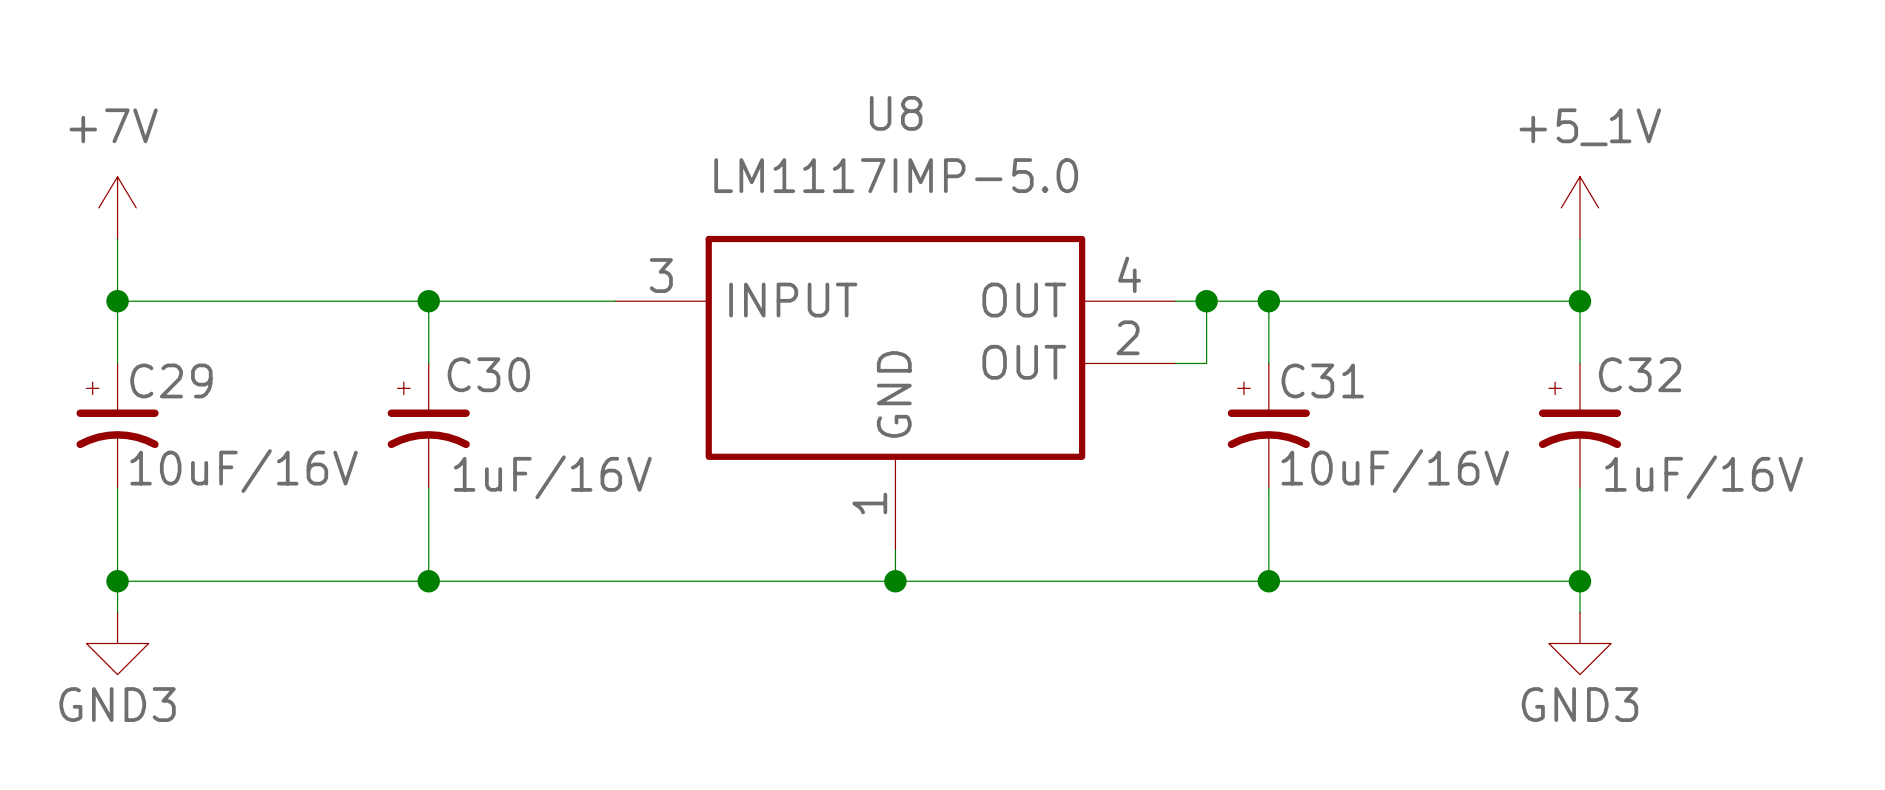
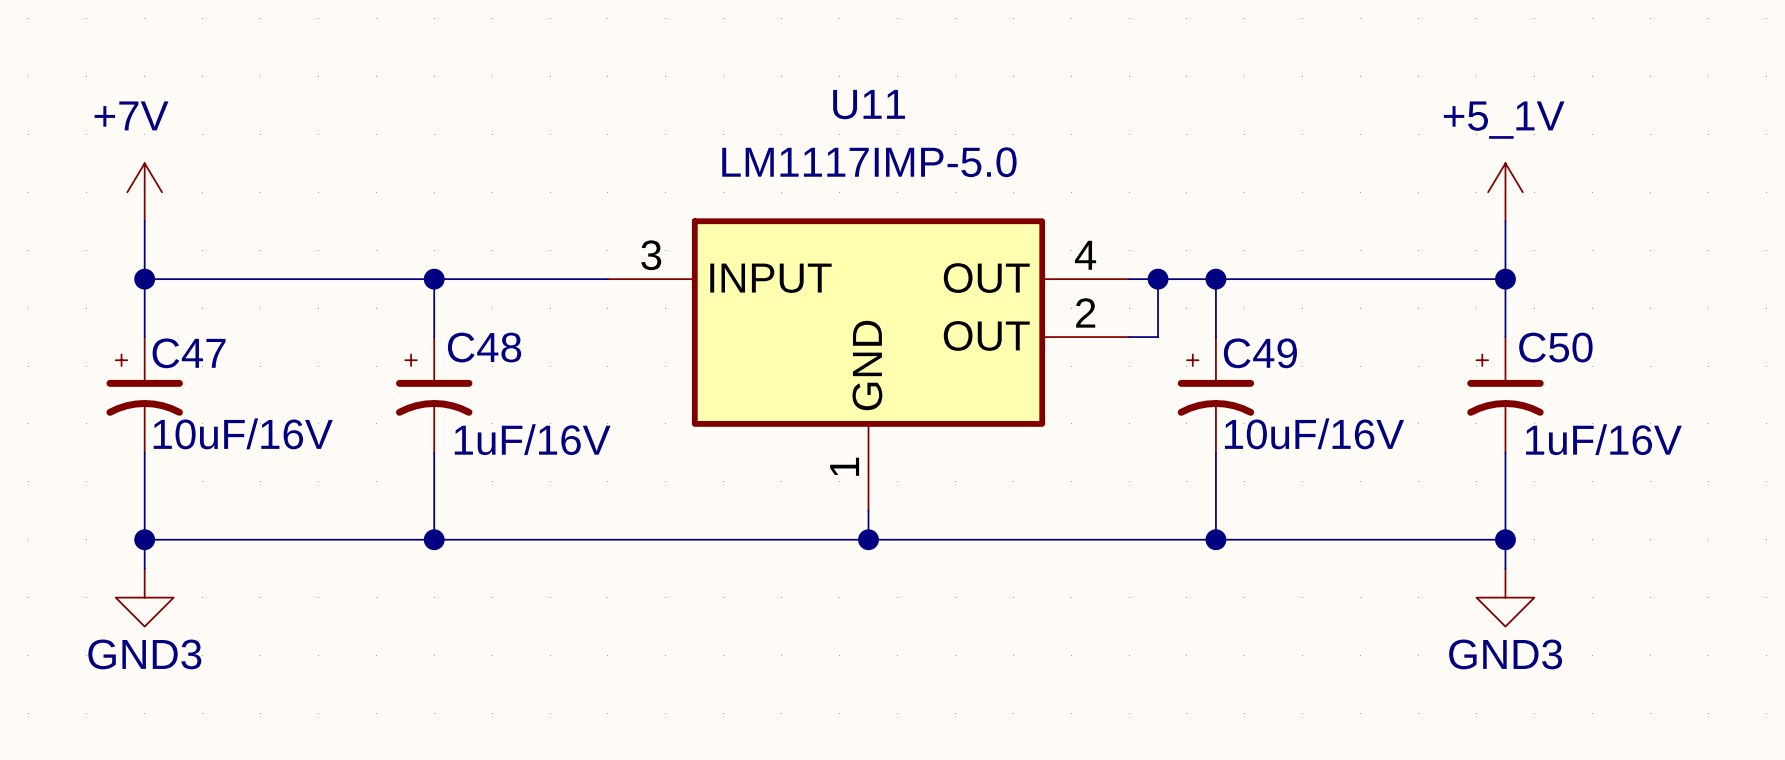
U8 name: U8 (896, 113) -> U11 (869, 104)
C30 name: C30 (488, 374) -> C48 (484, 347)
C32 name: C32 (1640, 374) -> C50 (1555, 347)
C29 name: C29 (171, 380) -> C47 (189, 353)
C31 name: C31 (1322, 380) -> C49 (1260, 353)

